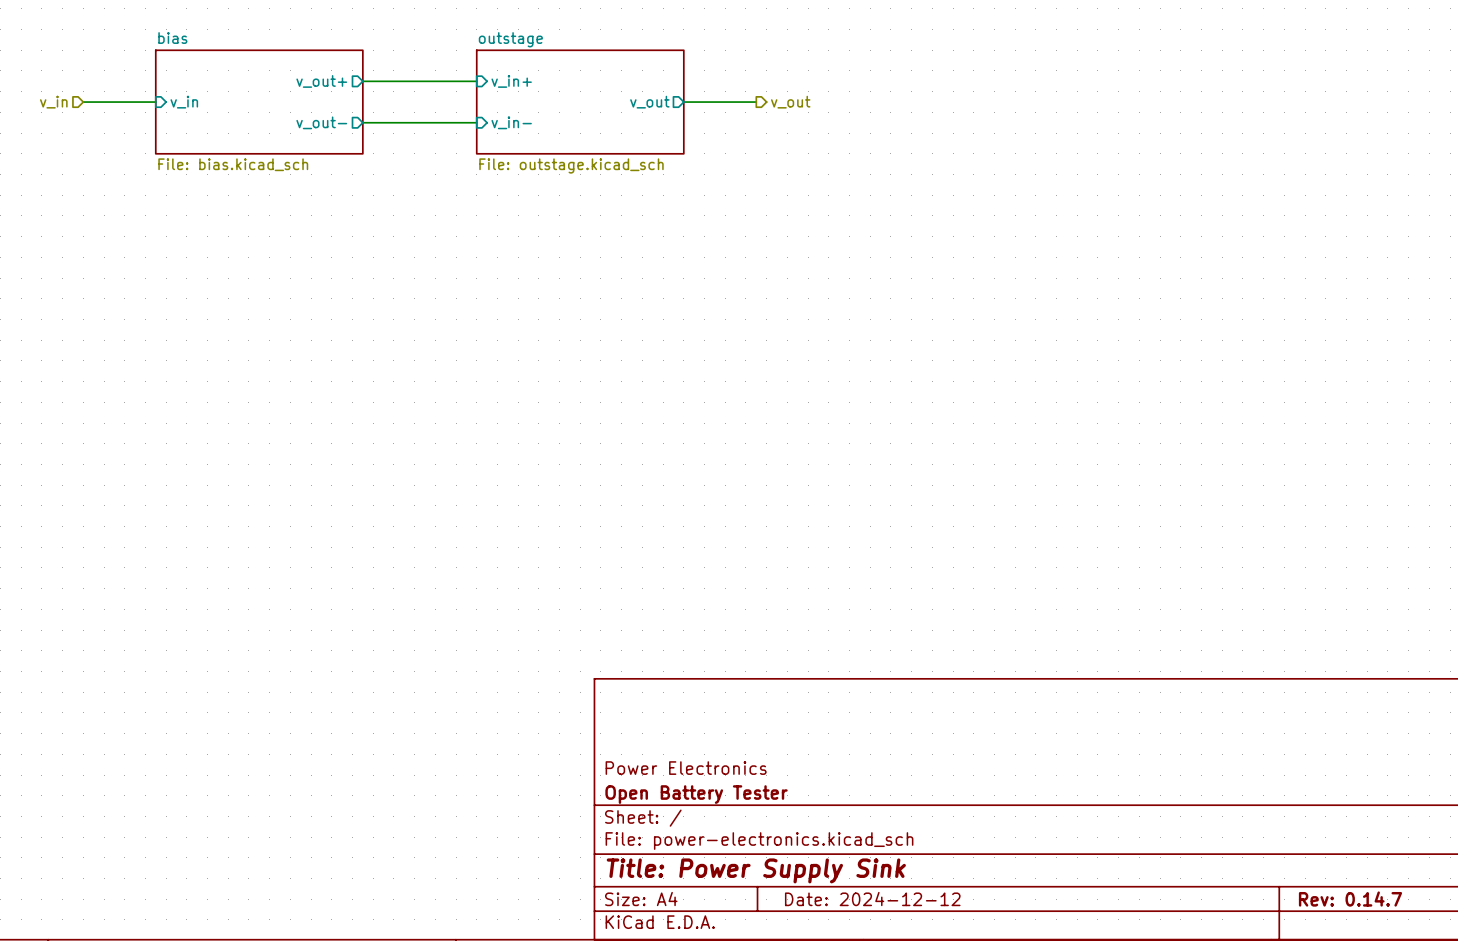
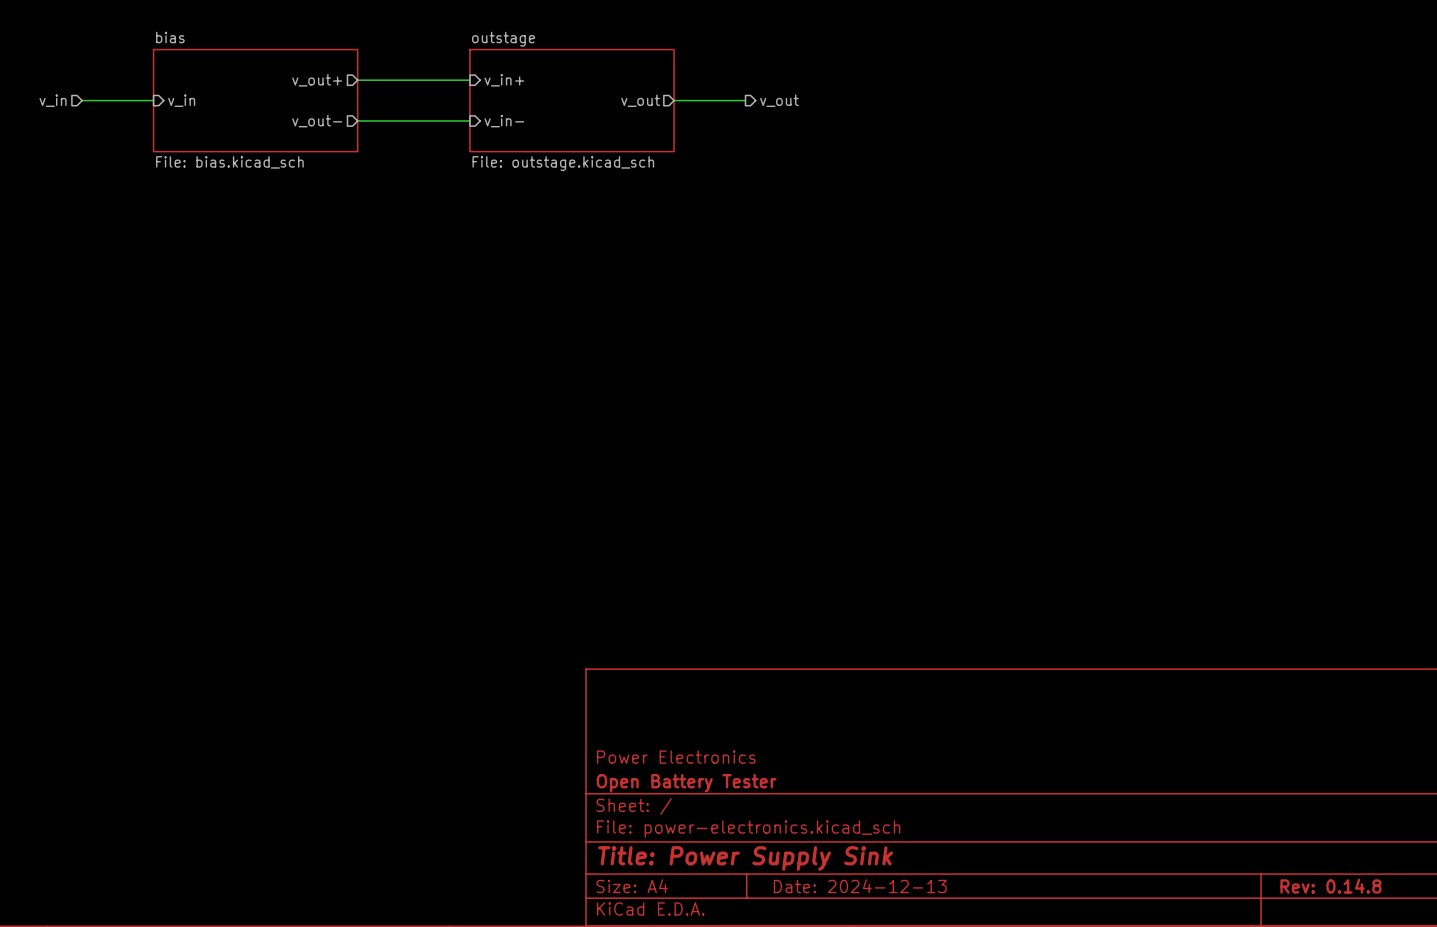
title block: Date: 2024-12-12 (872, 899) -> Date: 2024-12-13 (860, 886)
title block: Rev: 0.14.7 (1350, 899) -> Rev: 0.14.8 (1330, 886)

